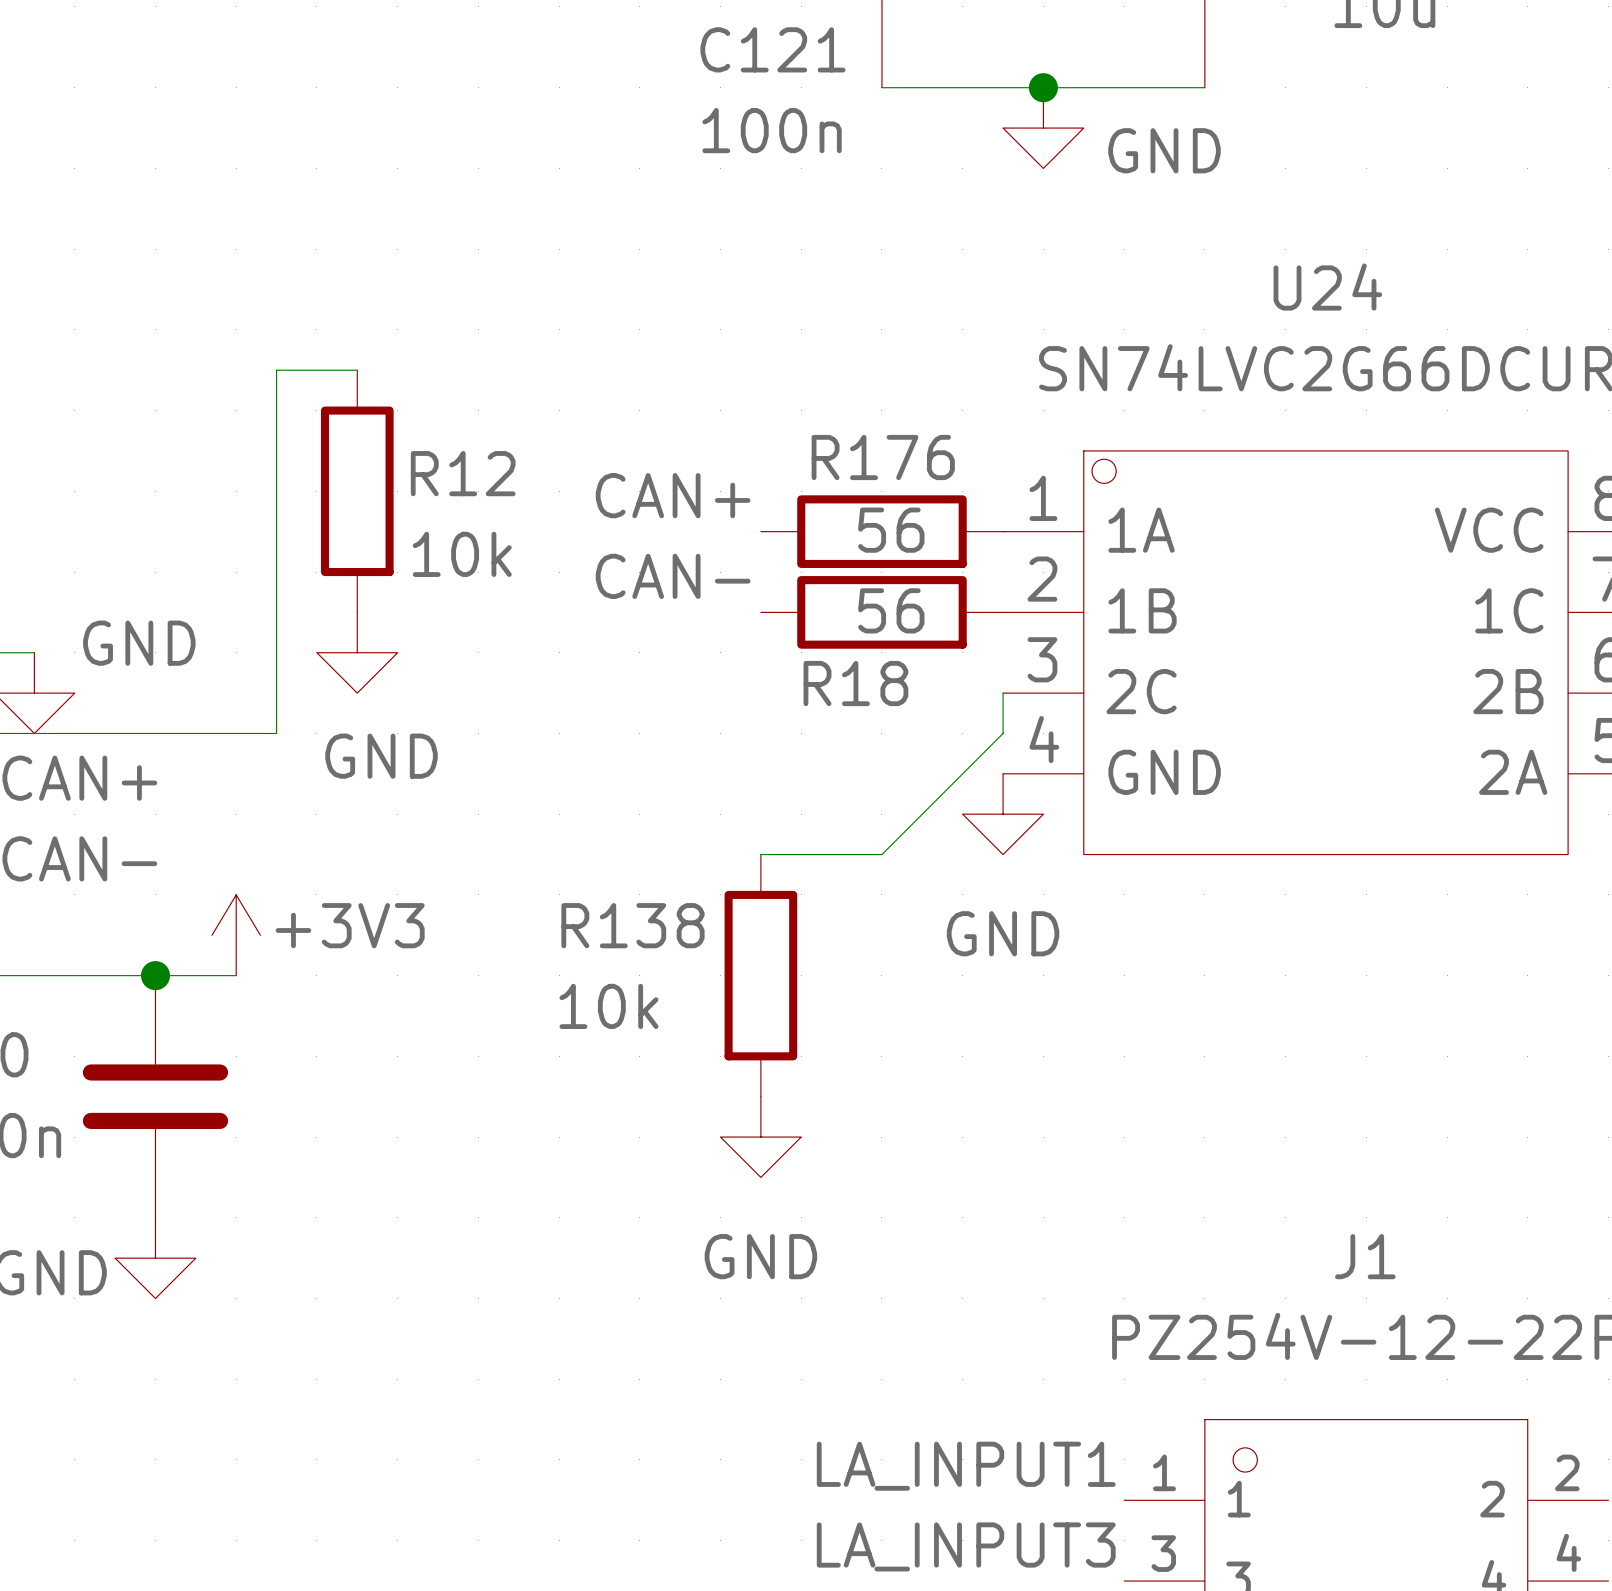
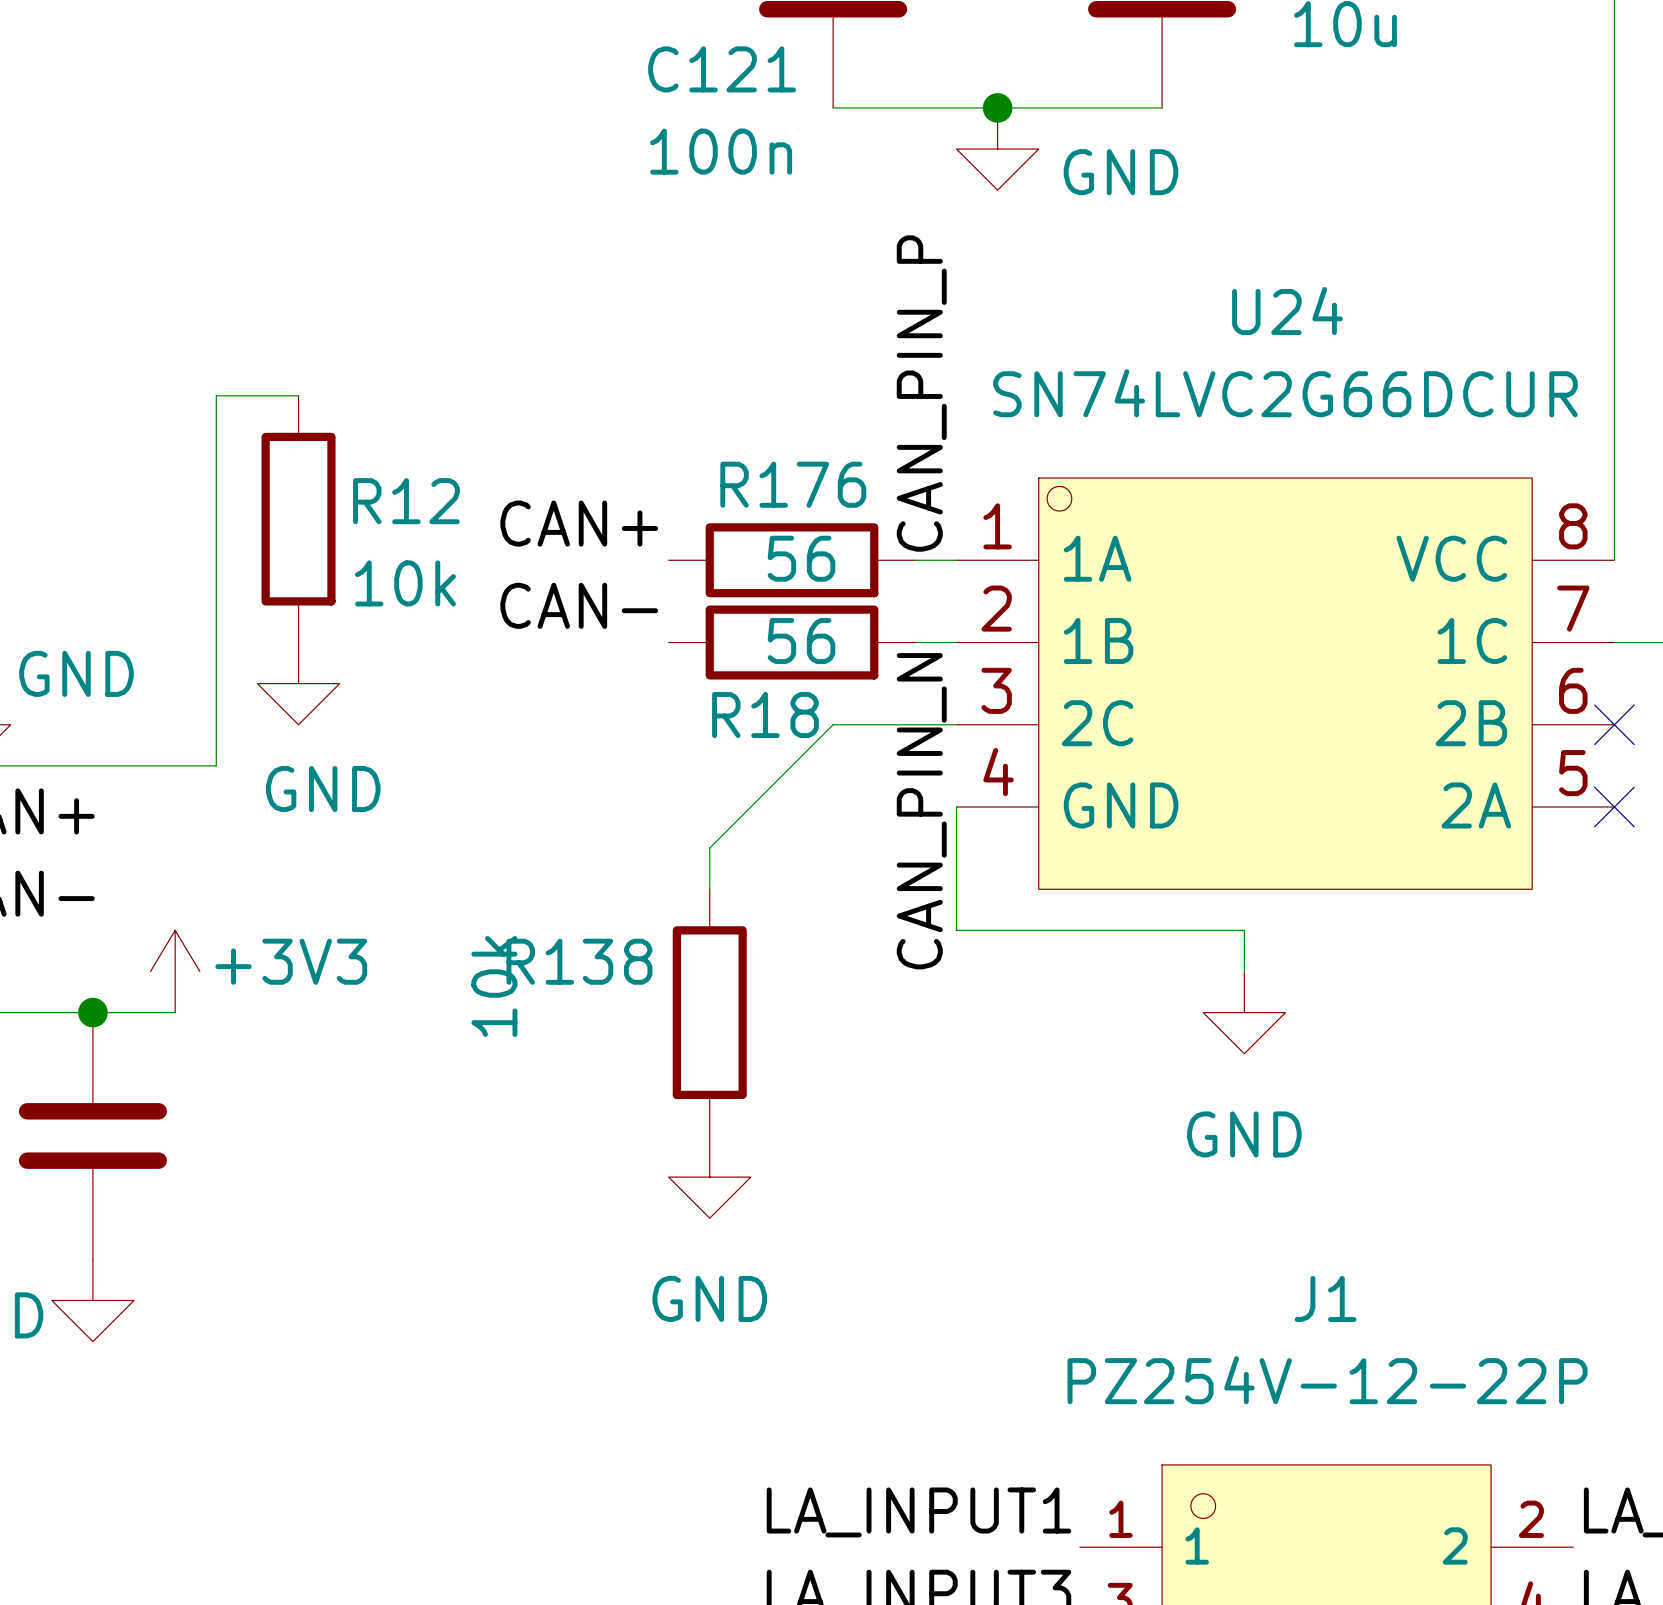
label: none -> CAN_PIN_P (921, 393)
label position: CAN+ (673, 495) -> CAN+ (579, 523)
R176 position: (881, 531) -> (792, 560)
label position: CAN- (673, 576) -> CAN- (579, 605)
R18 position: (881, 612) -> (792, 642)
wire: (1003, 693) (1003, 733) (881, 854) (760, 854) -> (956, 724) (833, 724) (709, 848) (709, 889)
wire: none -> (956, 807) (956, 930) (1244, 930) (1244, 971)
label: none -> CAN_PIN_N (921, 811)
power symbol position: GND (1003, 814) -> GND (1244, 1012)
R138 value rotation: 0° (608, 1006) -> 90° counterclockwise (494, 986)

